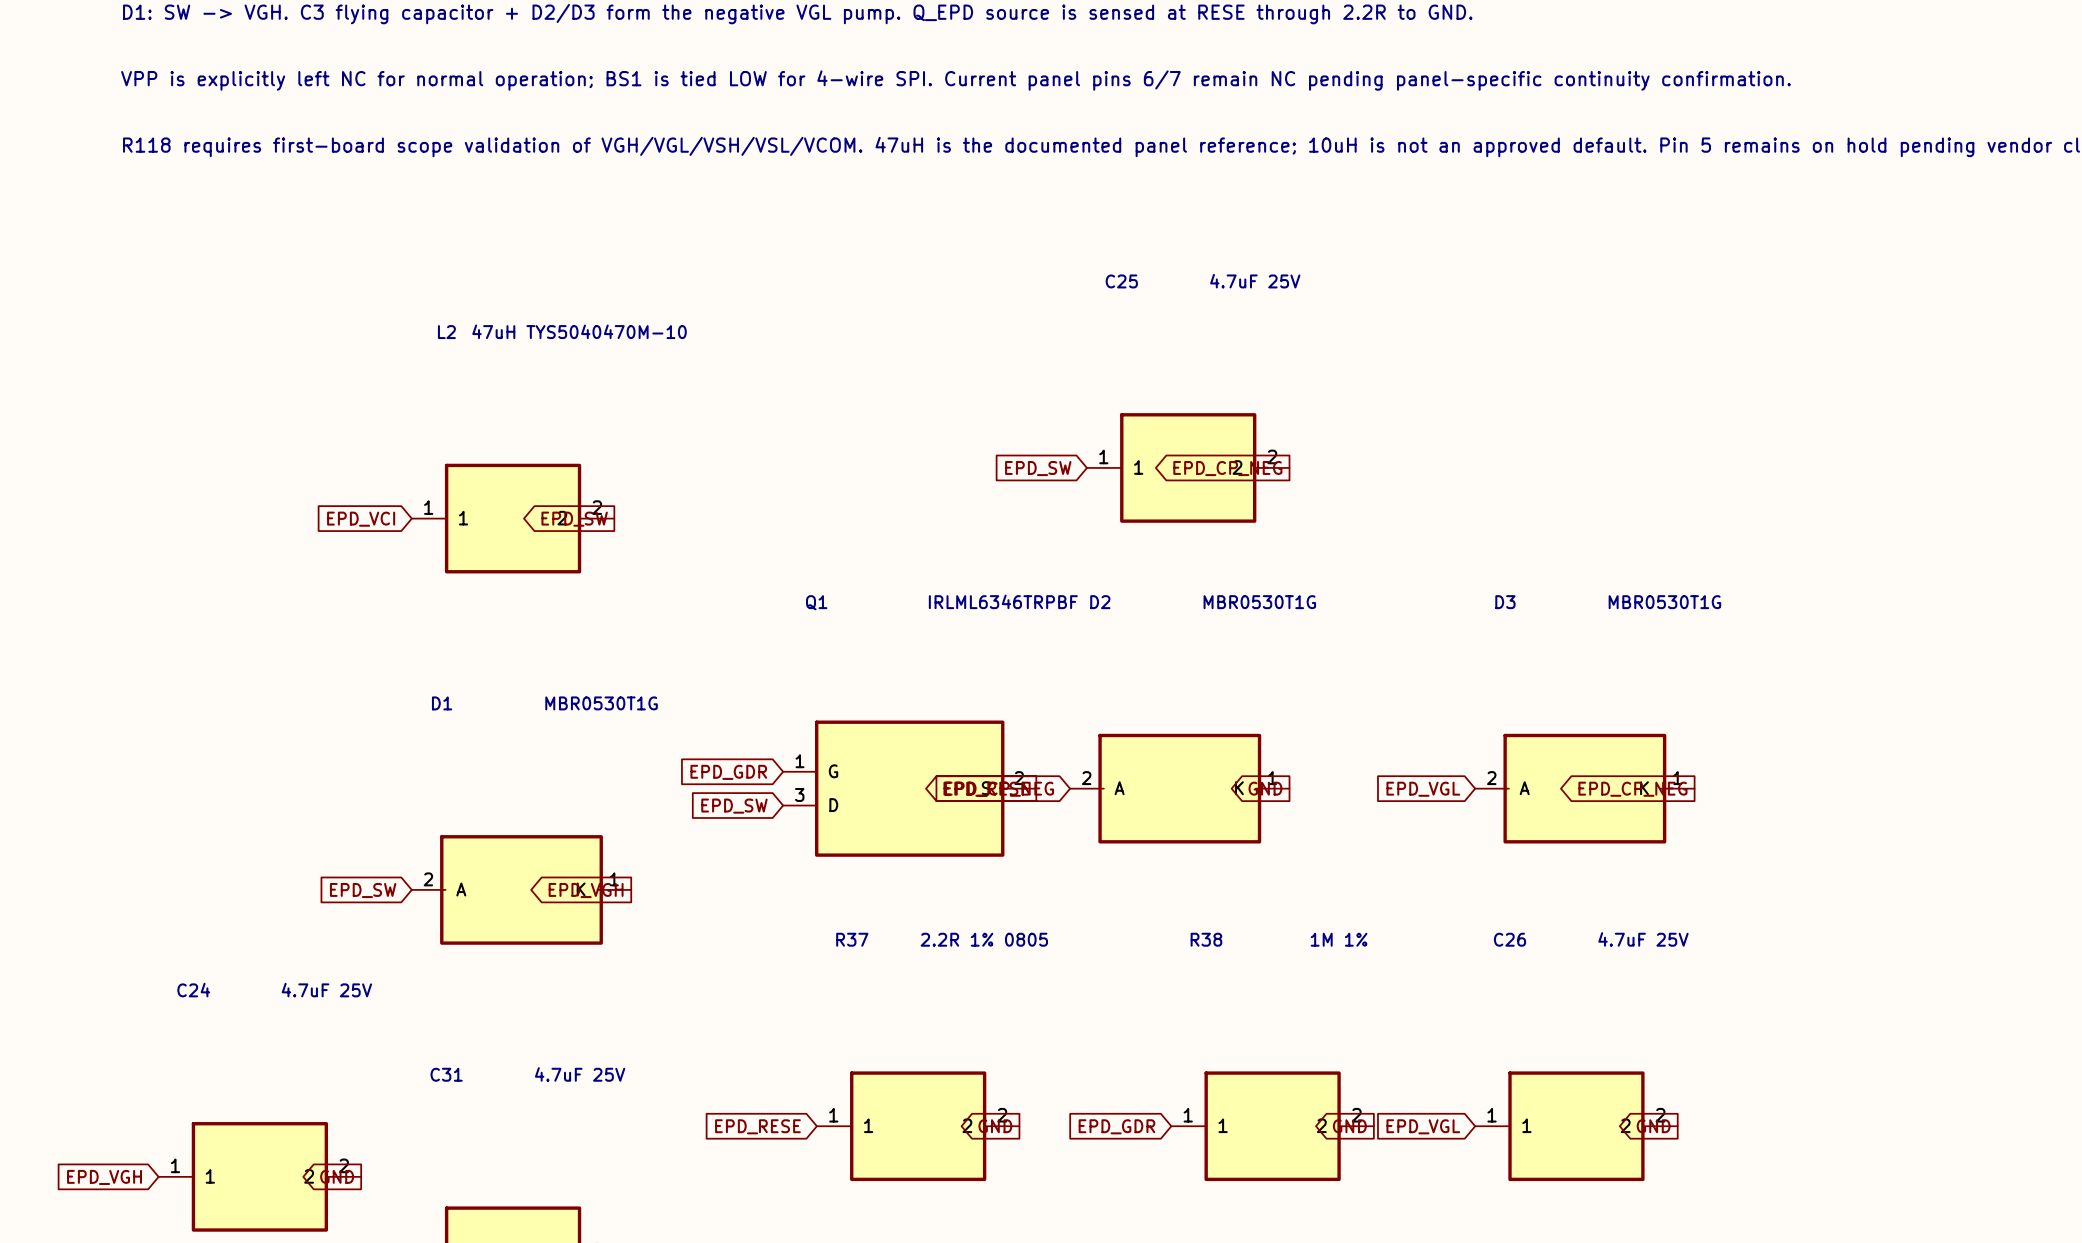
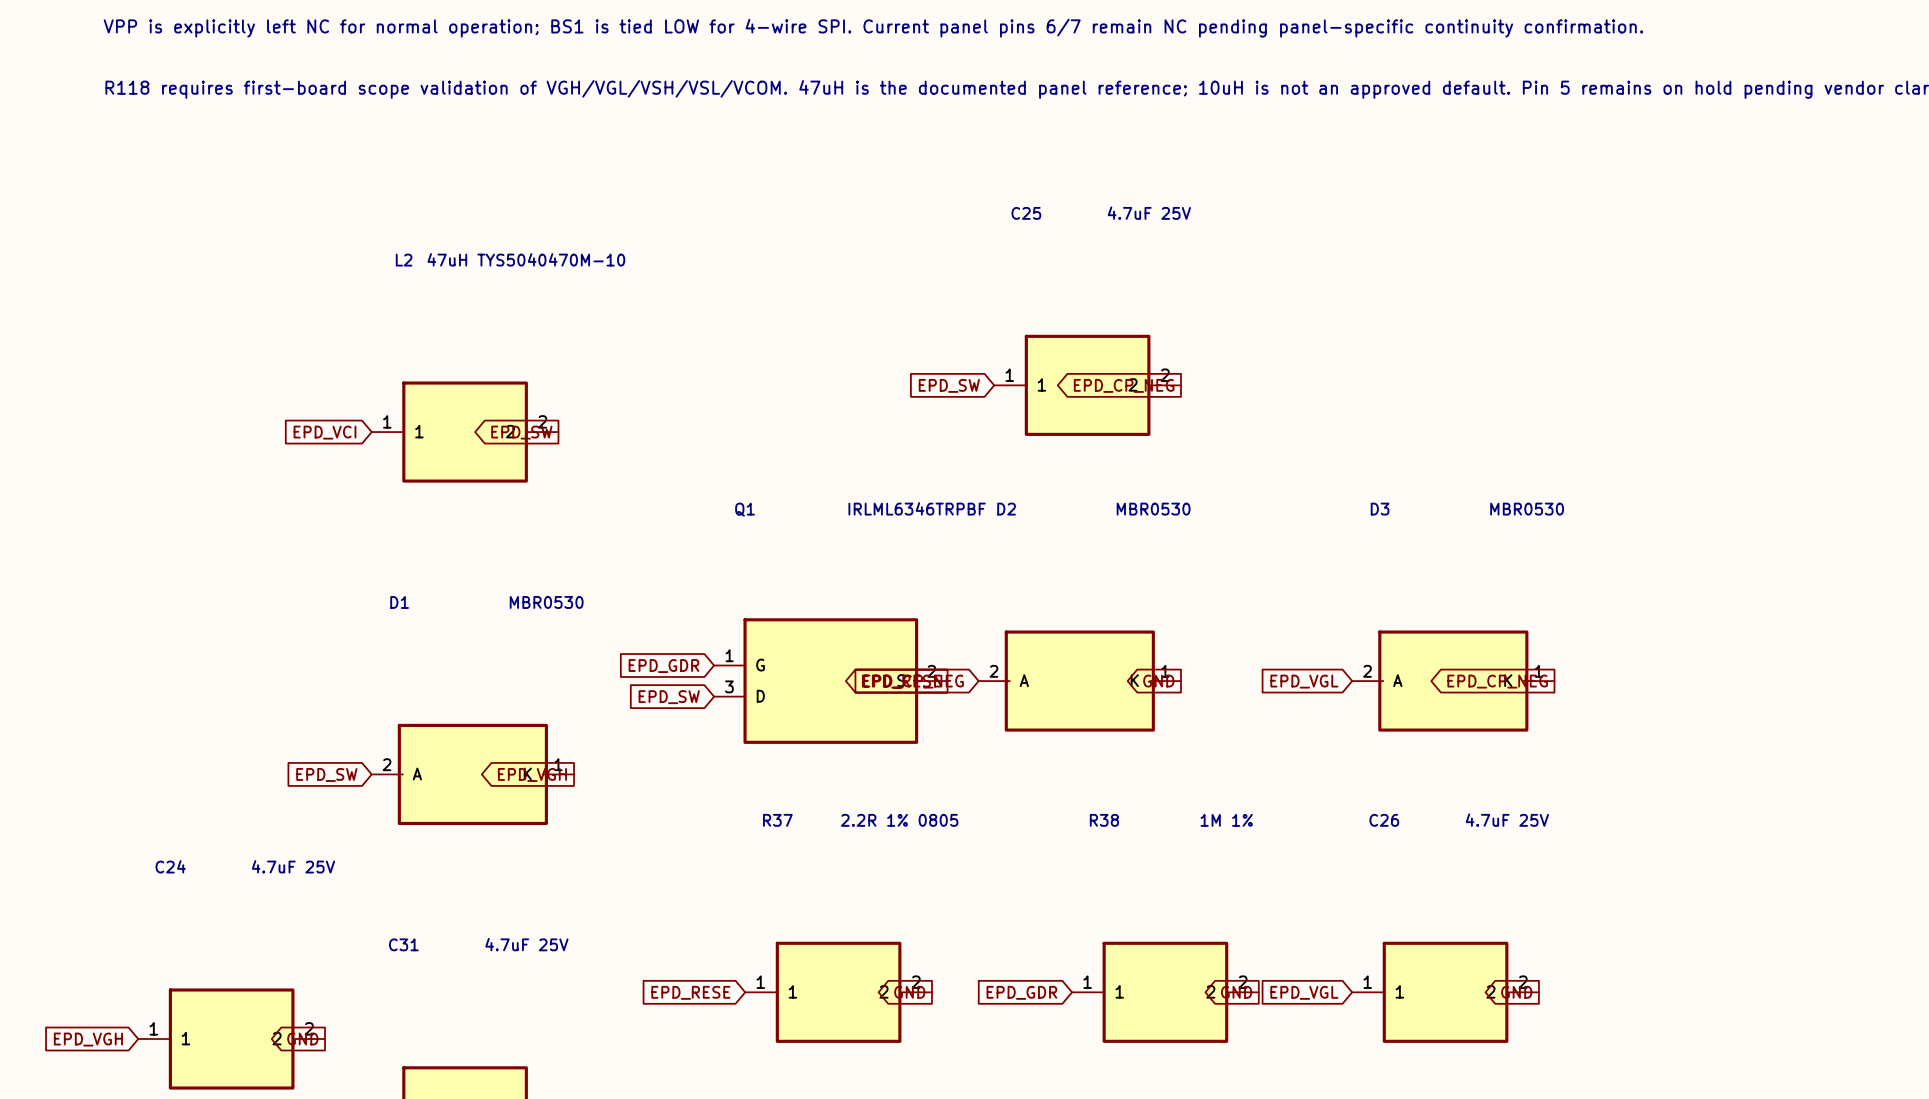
D2 value: MBR0530T1G (1259, 602) -> MBR0530 (1153, 509)
D3 value: MBR0530T1G (1664, 602) -> MBR0530 (1527, 509)
D1 value: MBR0530T1G (601, 703) -> MBR0530 (546, 602)

